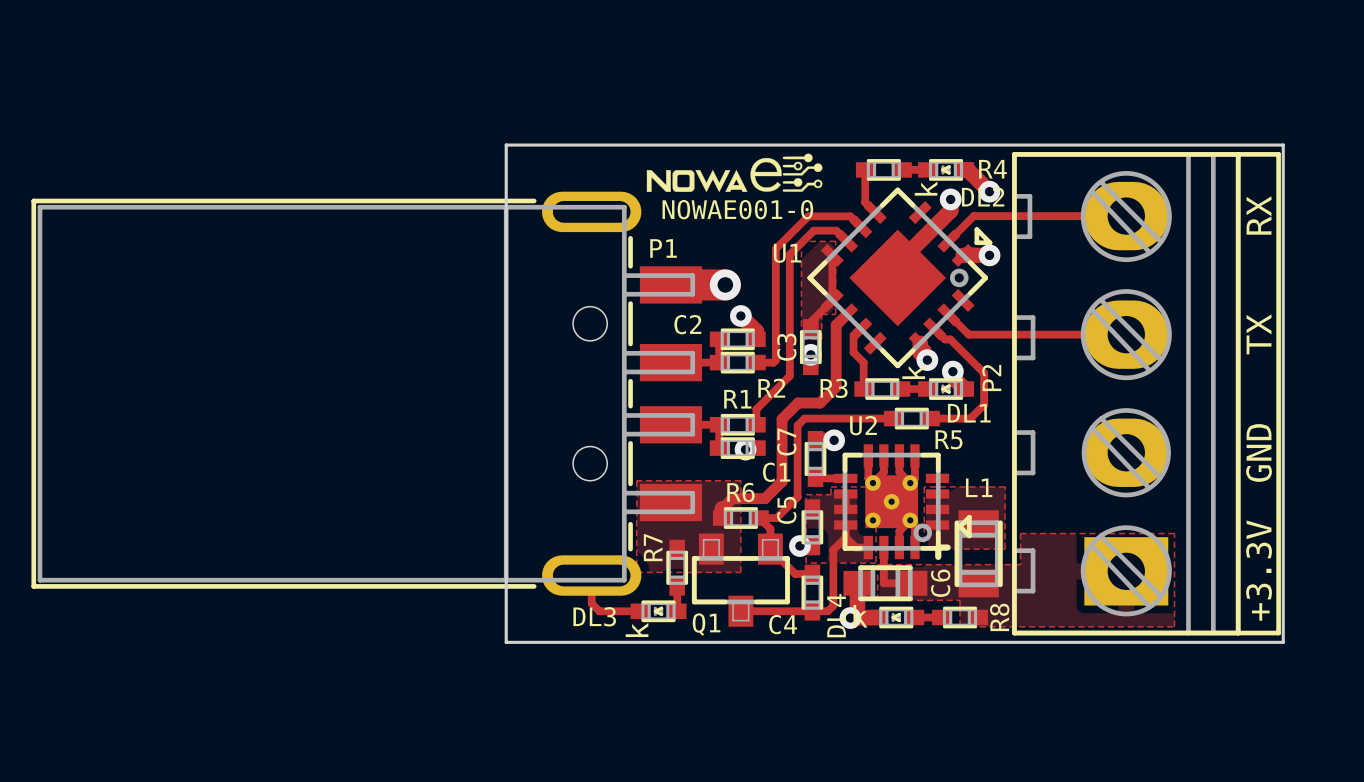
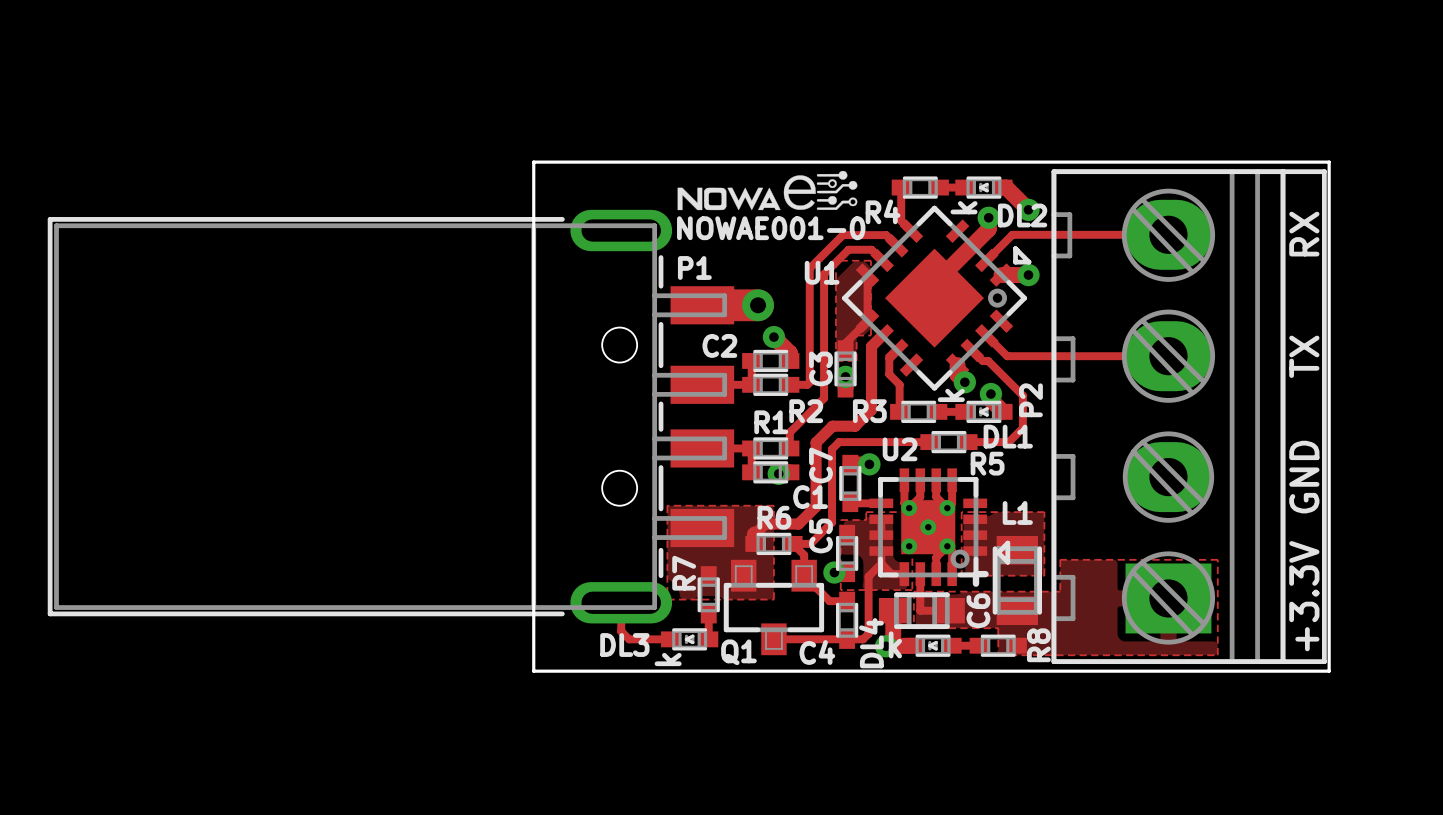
R4 name position: R4 (992, 169) -> R4 (883, 211)

